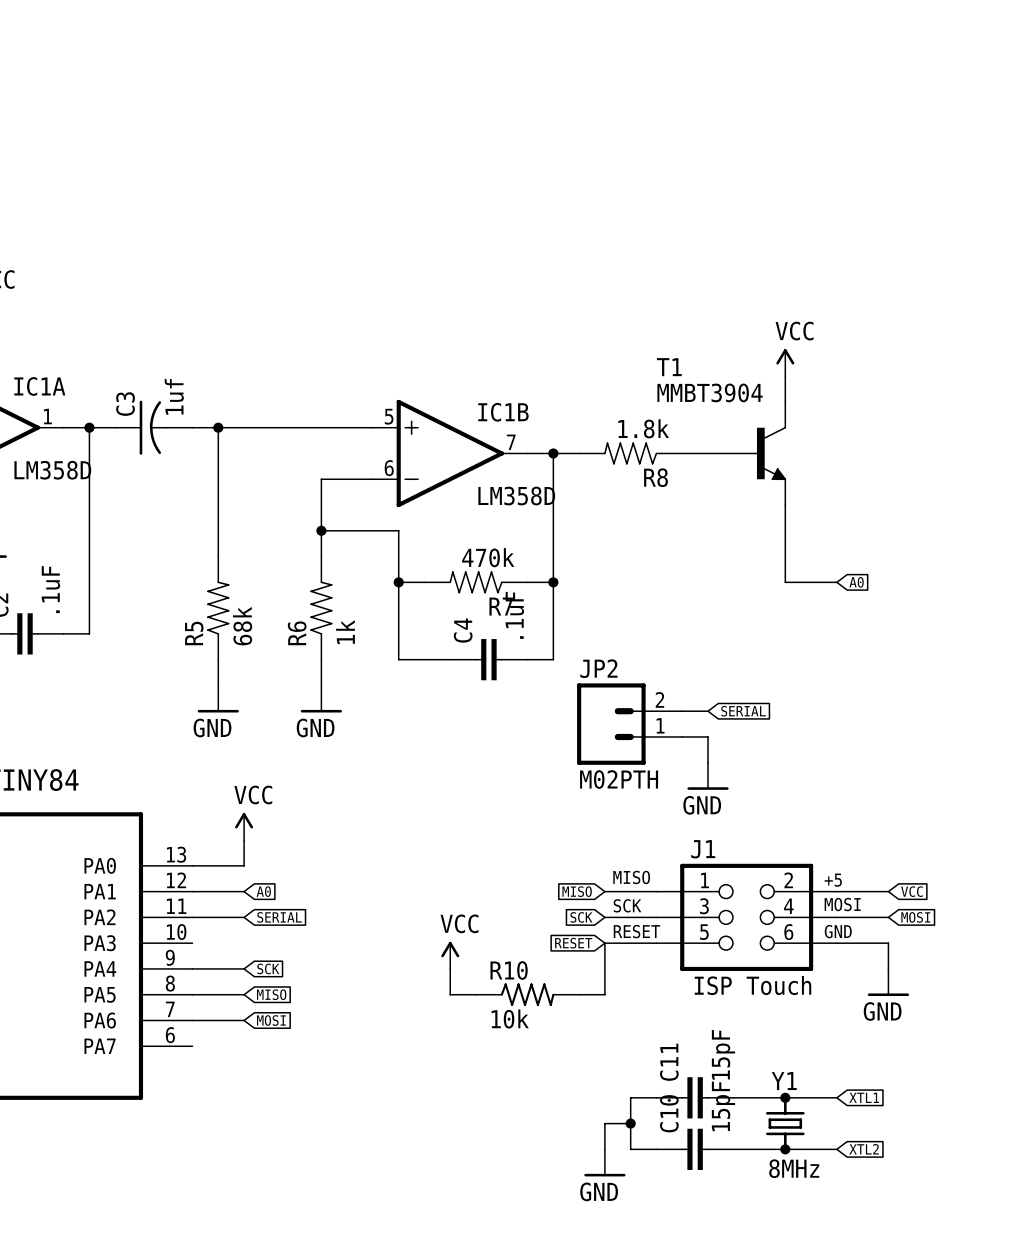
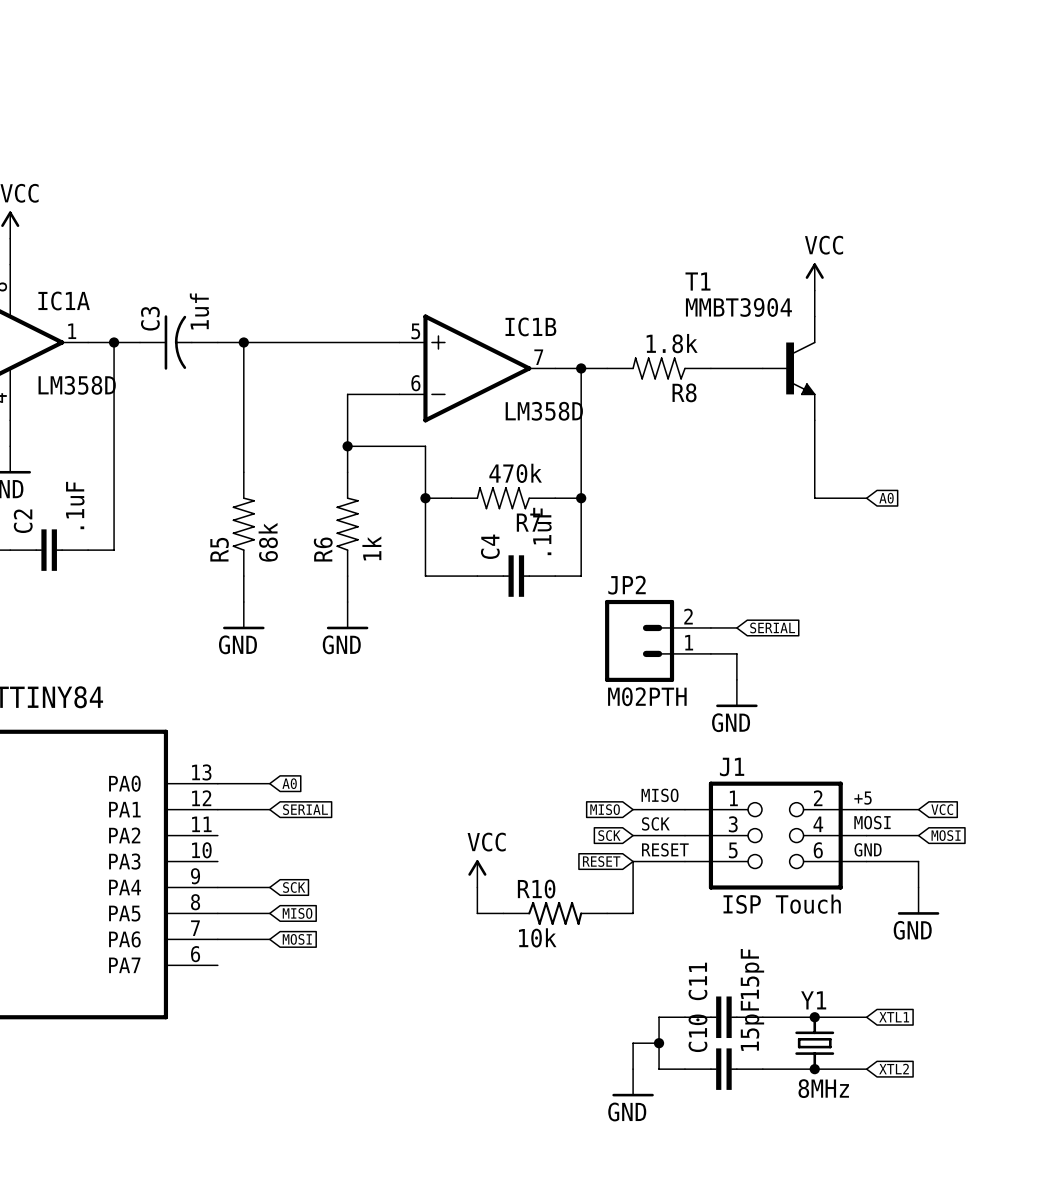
power symbol: VCC (244, 826) -> none
wire: (244, 840) (244, 865) -> none
global label: none -> A0 (289, 783)
global label: A0 (263, 891) -> SERIAL (305, 809)
wire: (192, 917) (244, 917) -> none
global label: SERIAL (279, 917) -> none

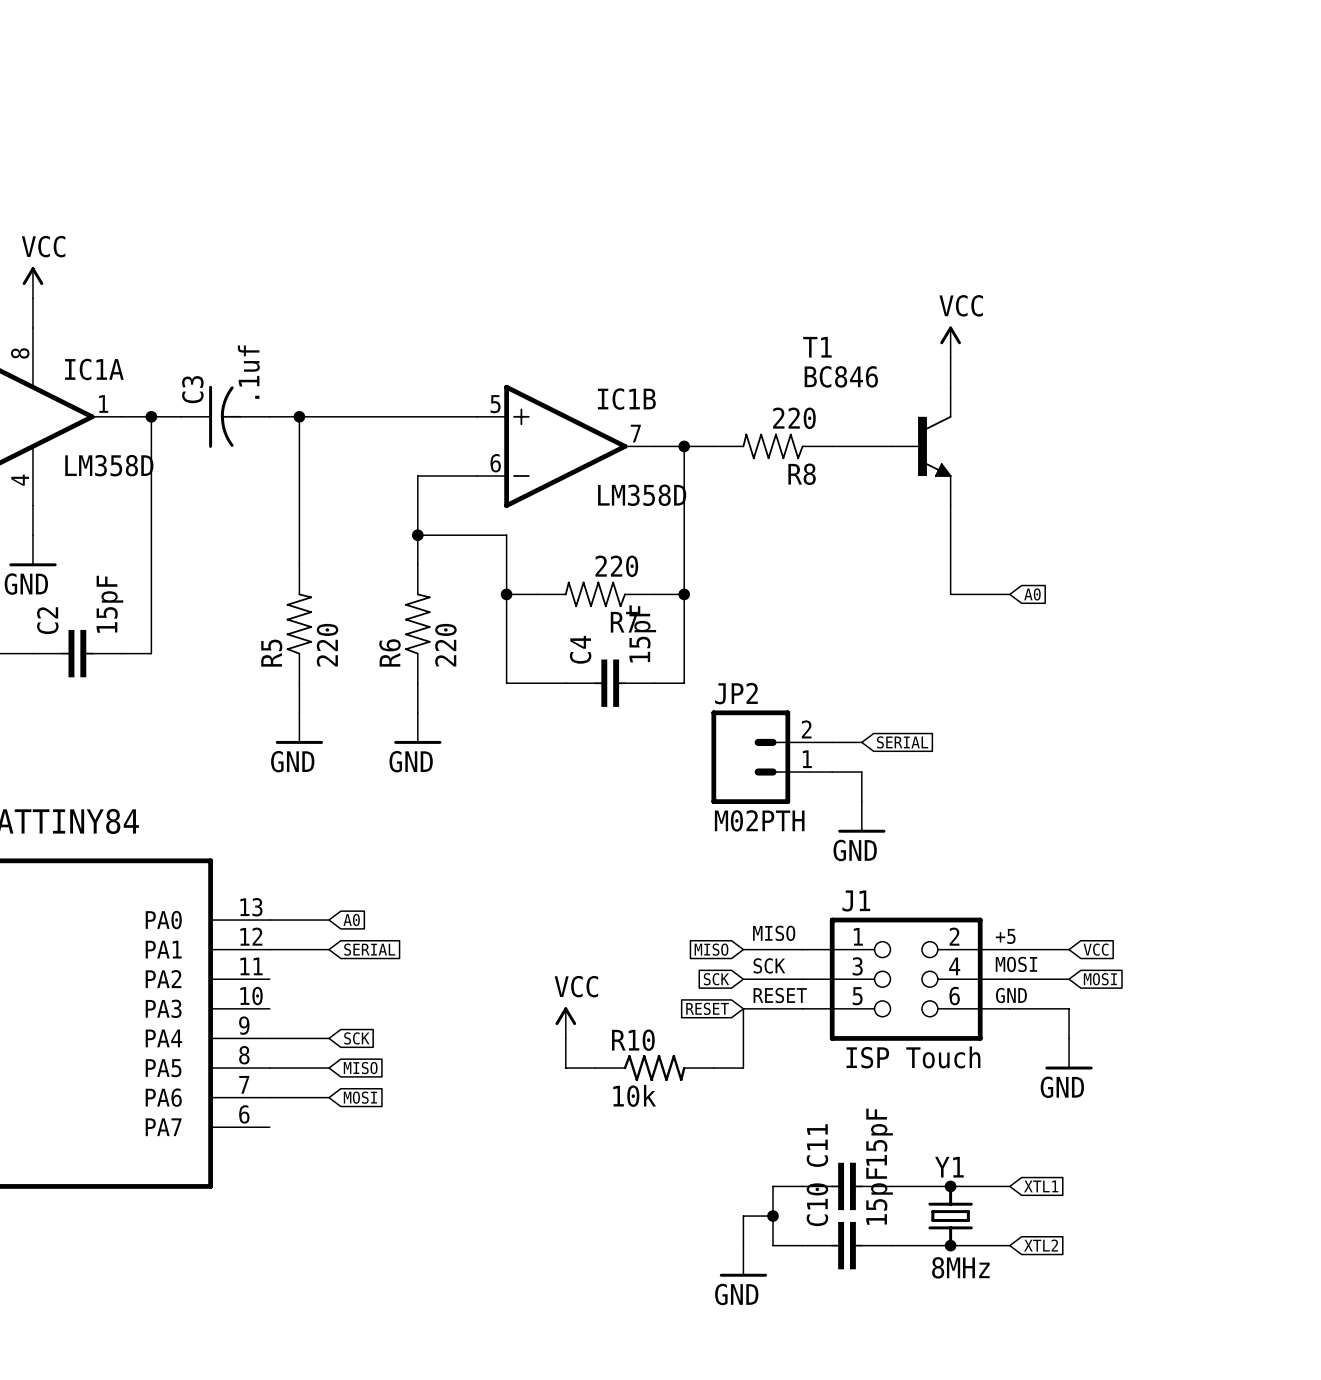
T1 value: MMBT3904 (738, 307) -> BC846 (841, 376)
C3 value: 1uf (199, 311) -> .1uf (248, 372)
R8 value: 1.8k (672, 343) -> 220 (794, 418)
R7 value: 470k (515, 473) -> 220 (616, 566)
C2 value: .1uF (75, 505) -> 15pF (109, 604)
C4 value: .1uF (542, 531) -> 15pF (642, 633)
R5 value: 68k (268, 542) -> 220 (327, 645)
R6 value: 1k (371, 548) -> 220 (445, 645)

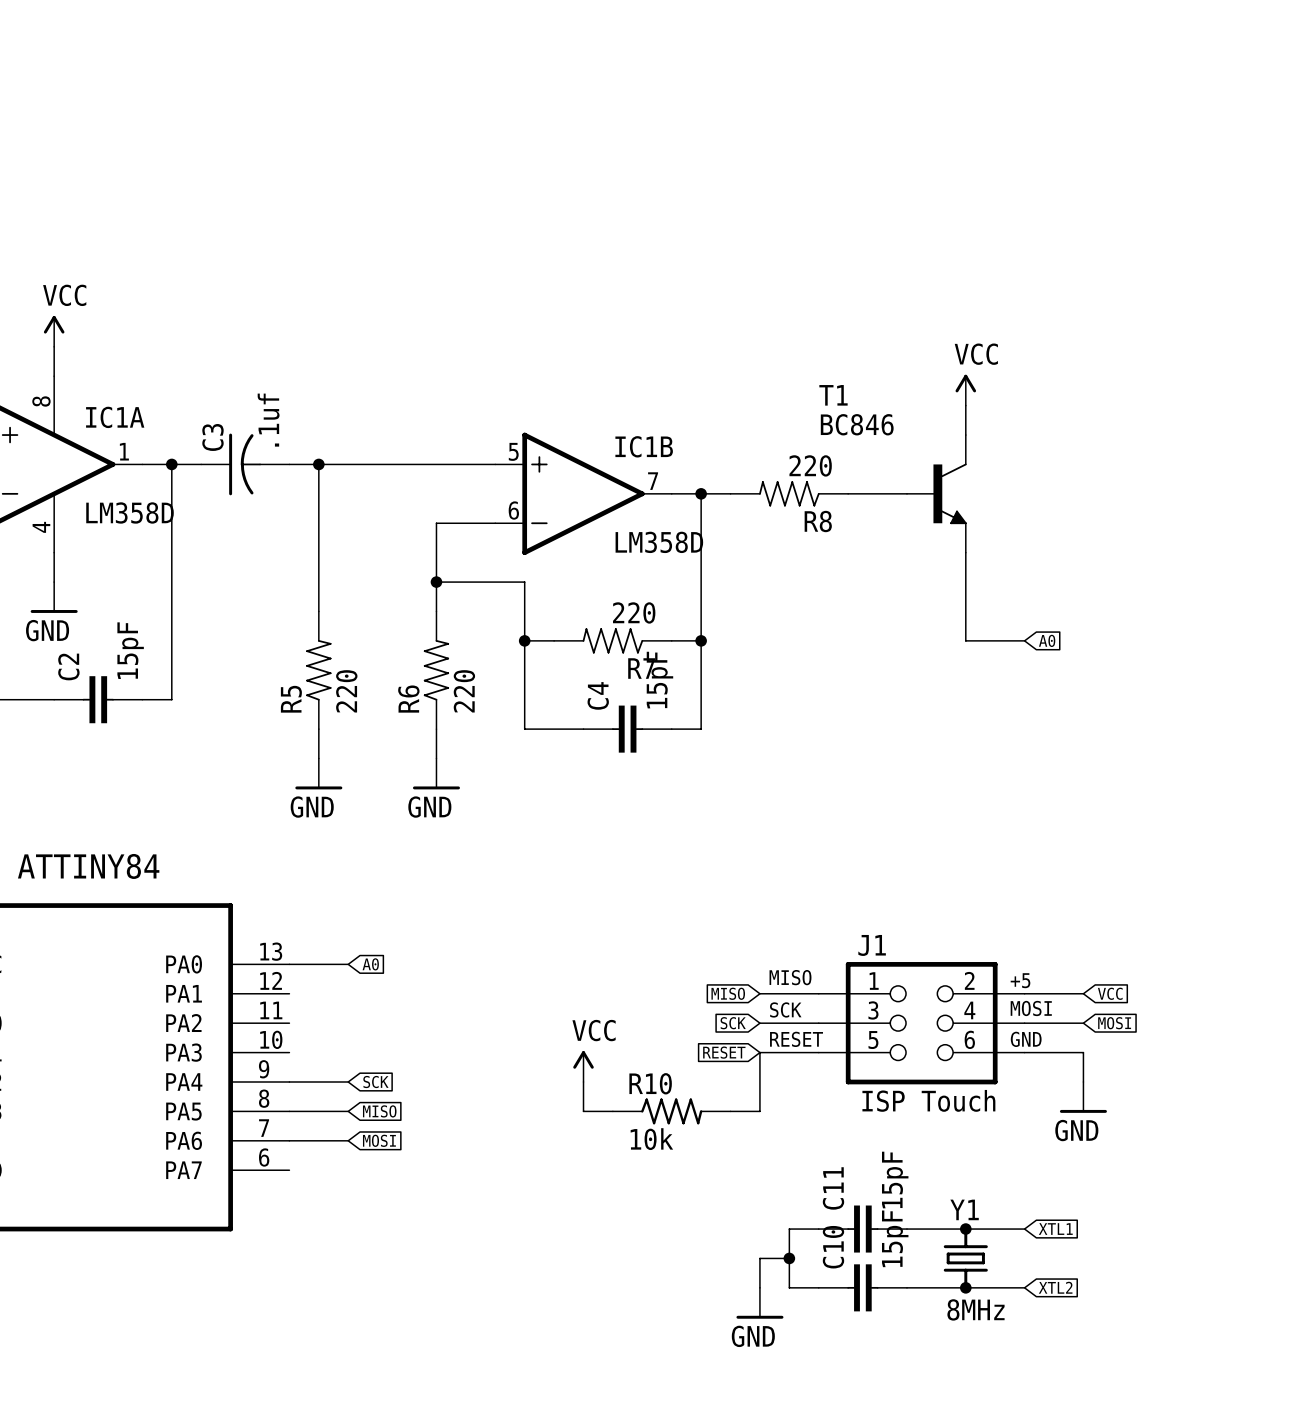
wire: (832, 742) (861, 742) -> none
global label: SERIAL (902, 742) -> none
JP2: M02PTH (771, 757) -> none
wire: (832, 772) (861, 772) (861, 801) -> none
power symbol: GND (861, 817) -> none
wire: (269, 949) (328, 949) -> none
global label: SERIAL (369, 949) -> none

